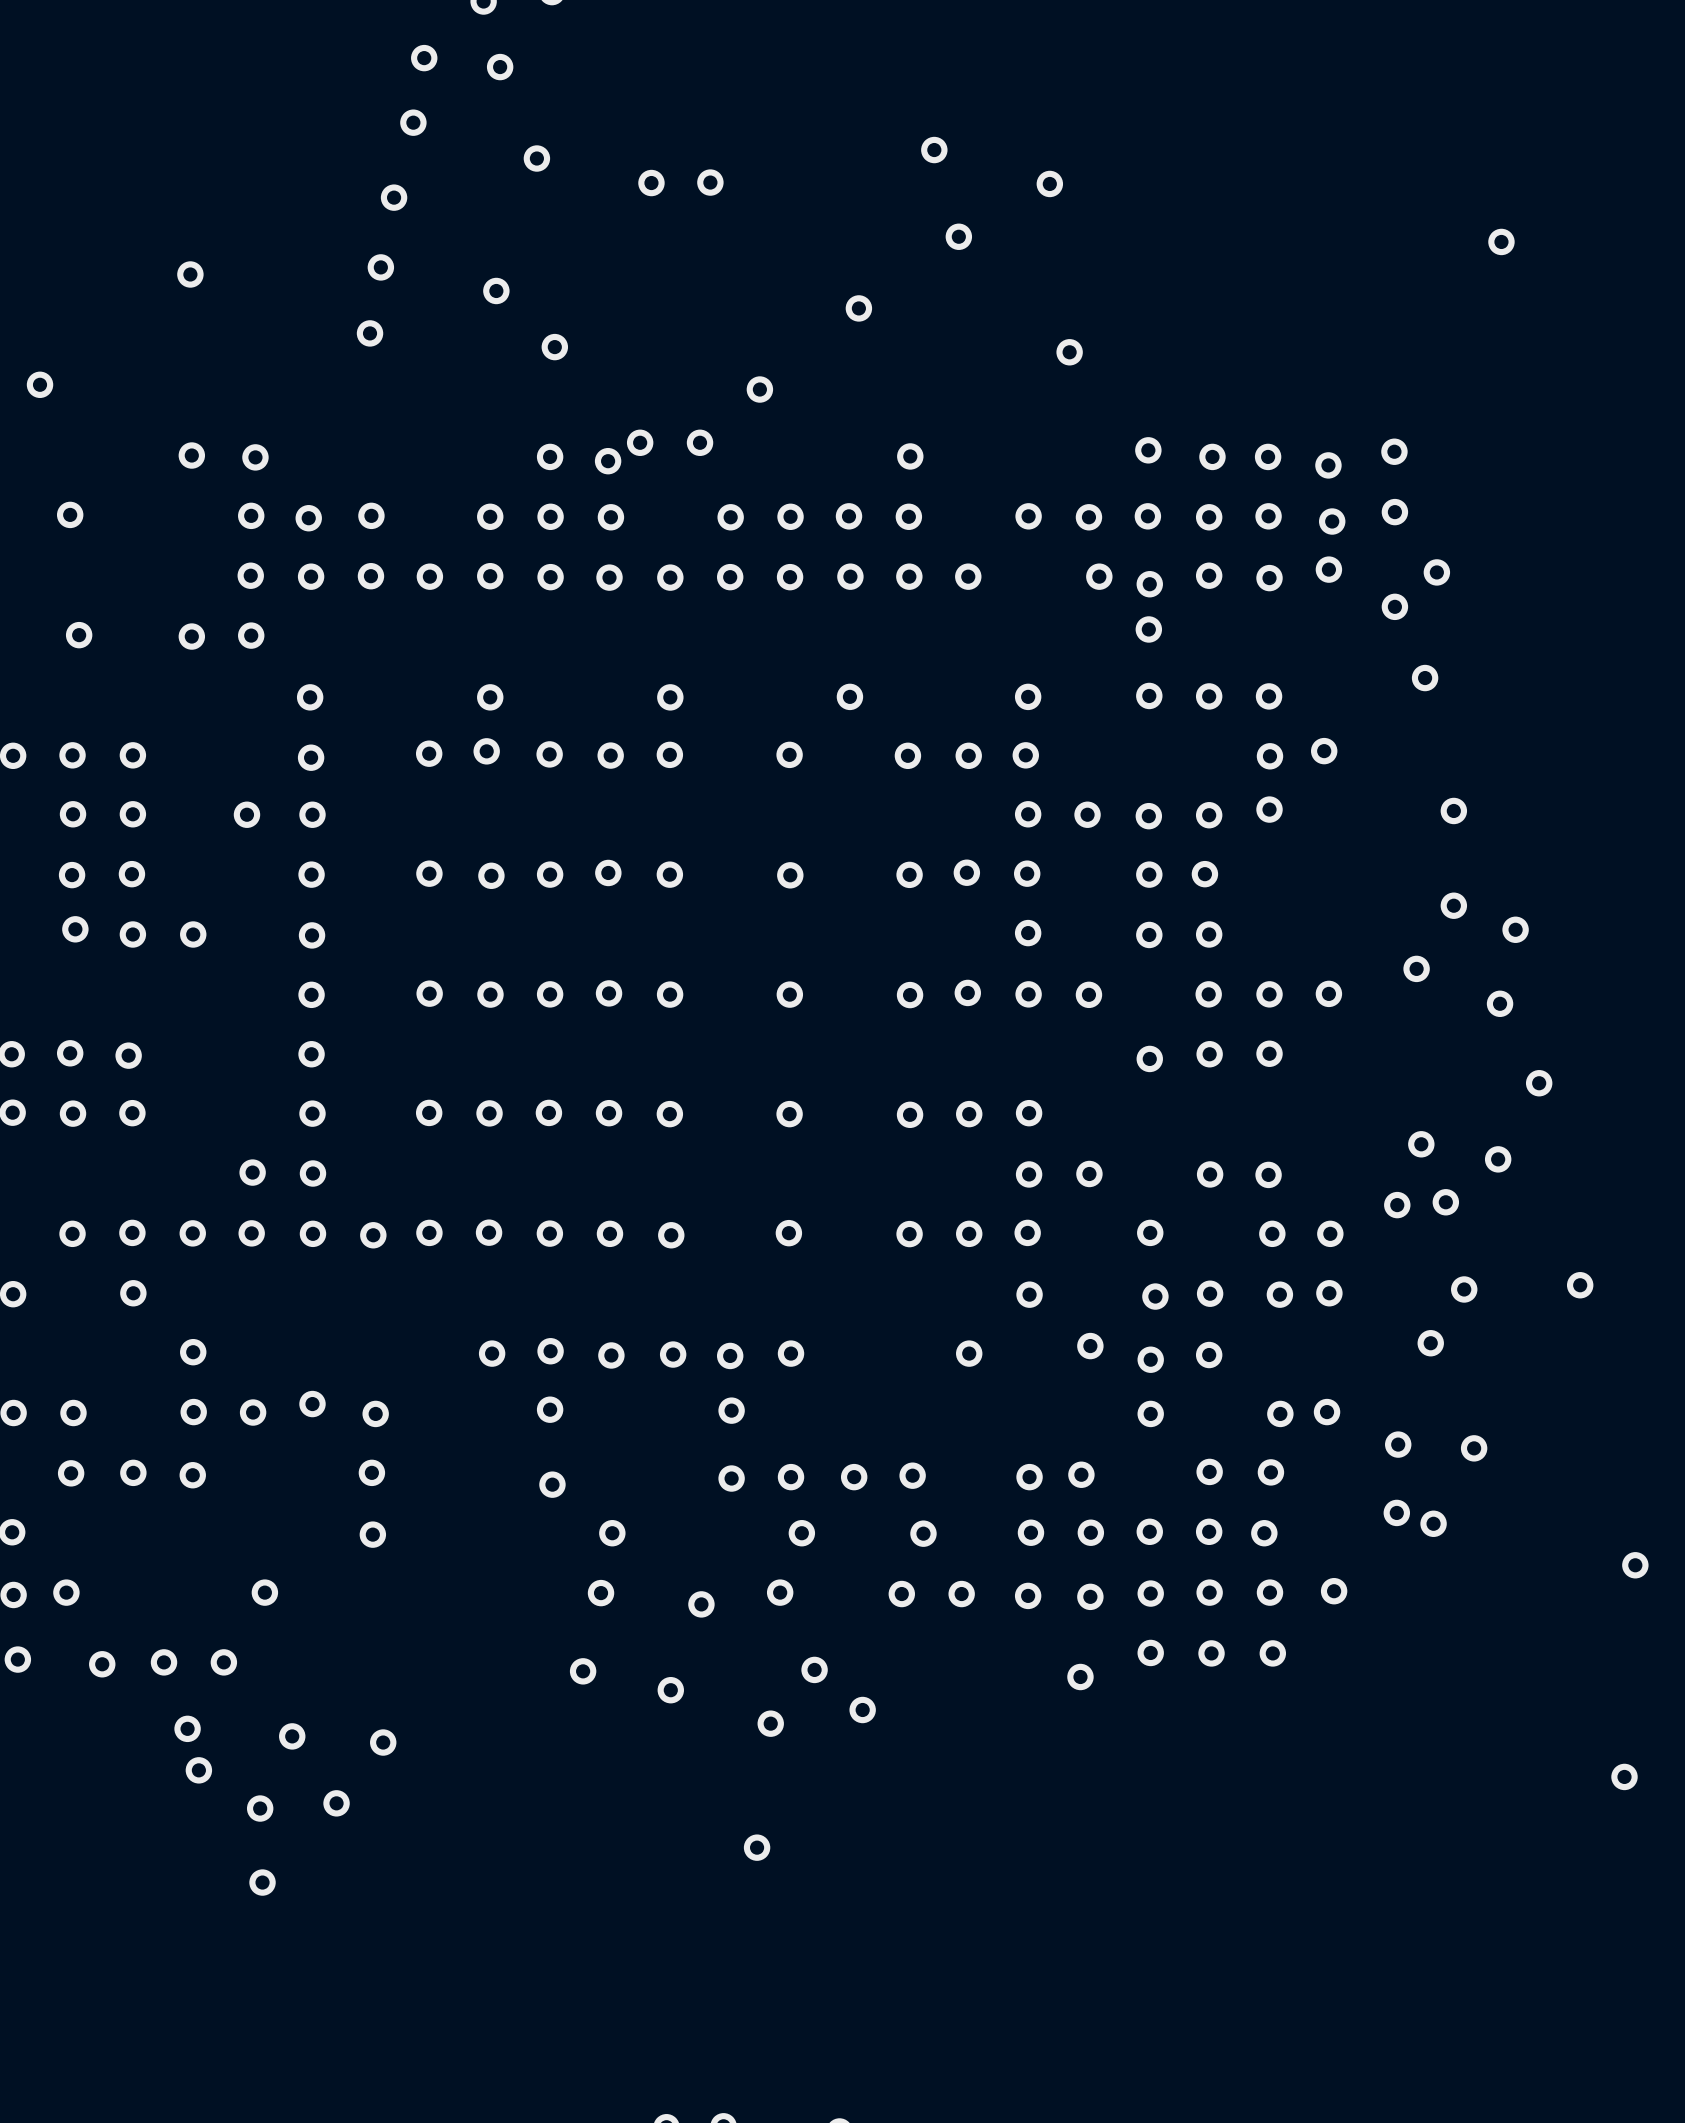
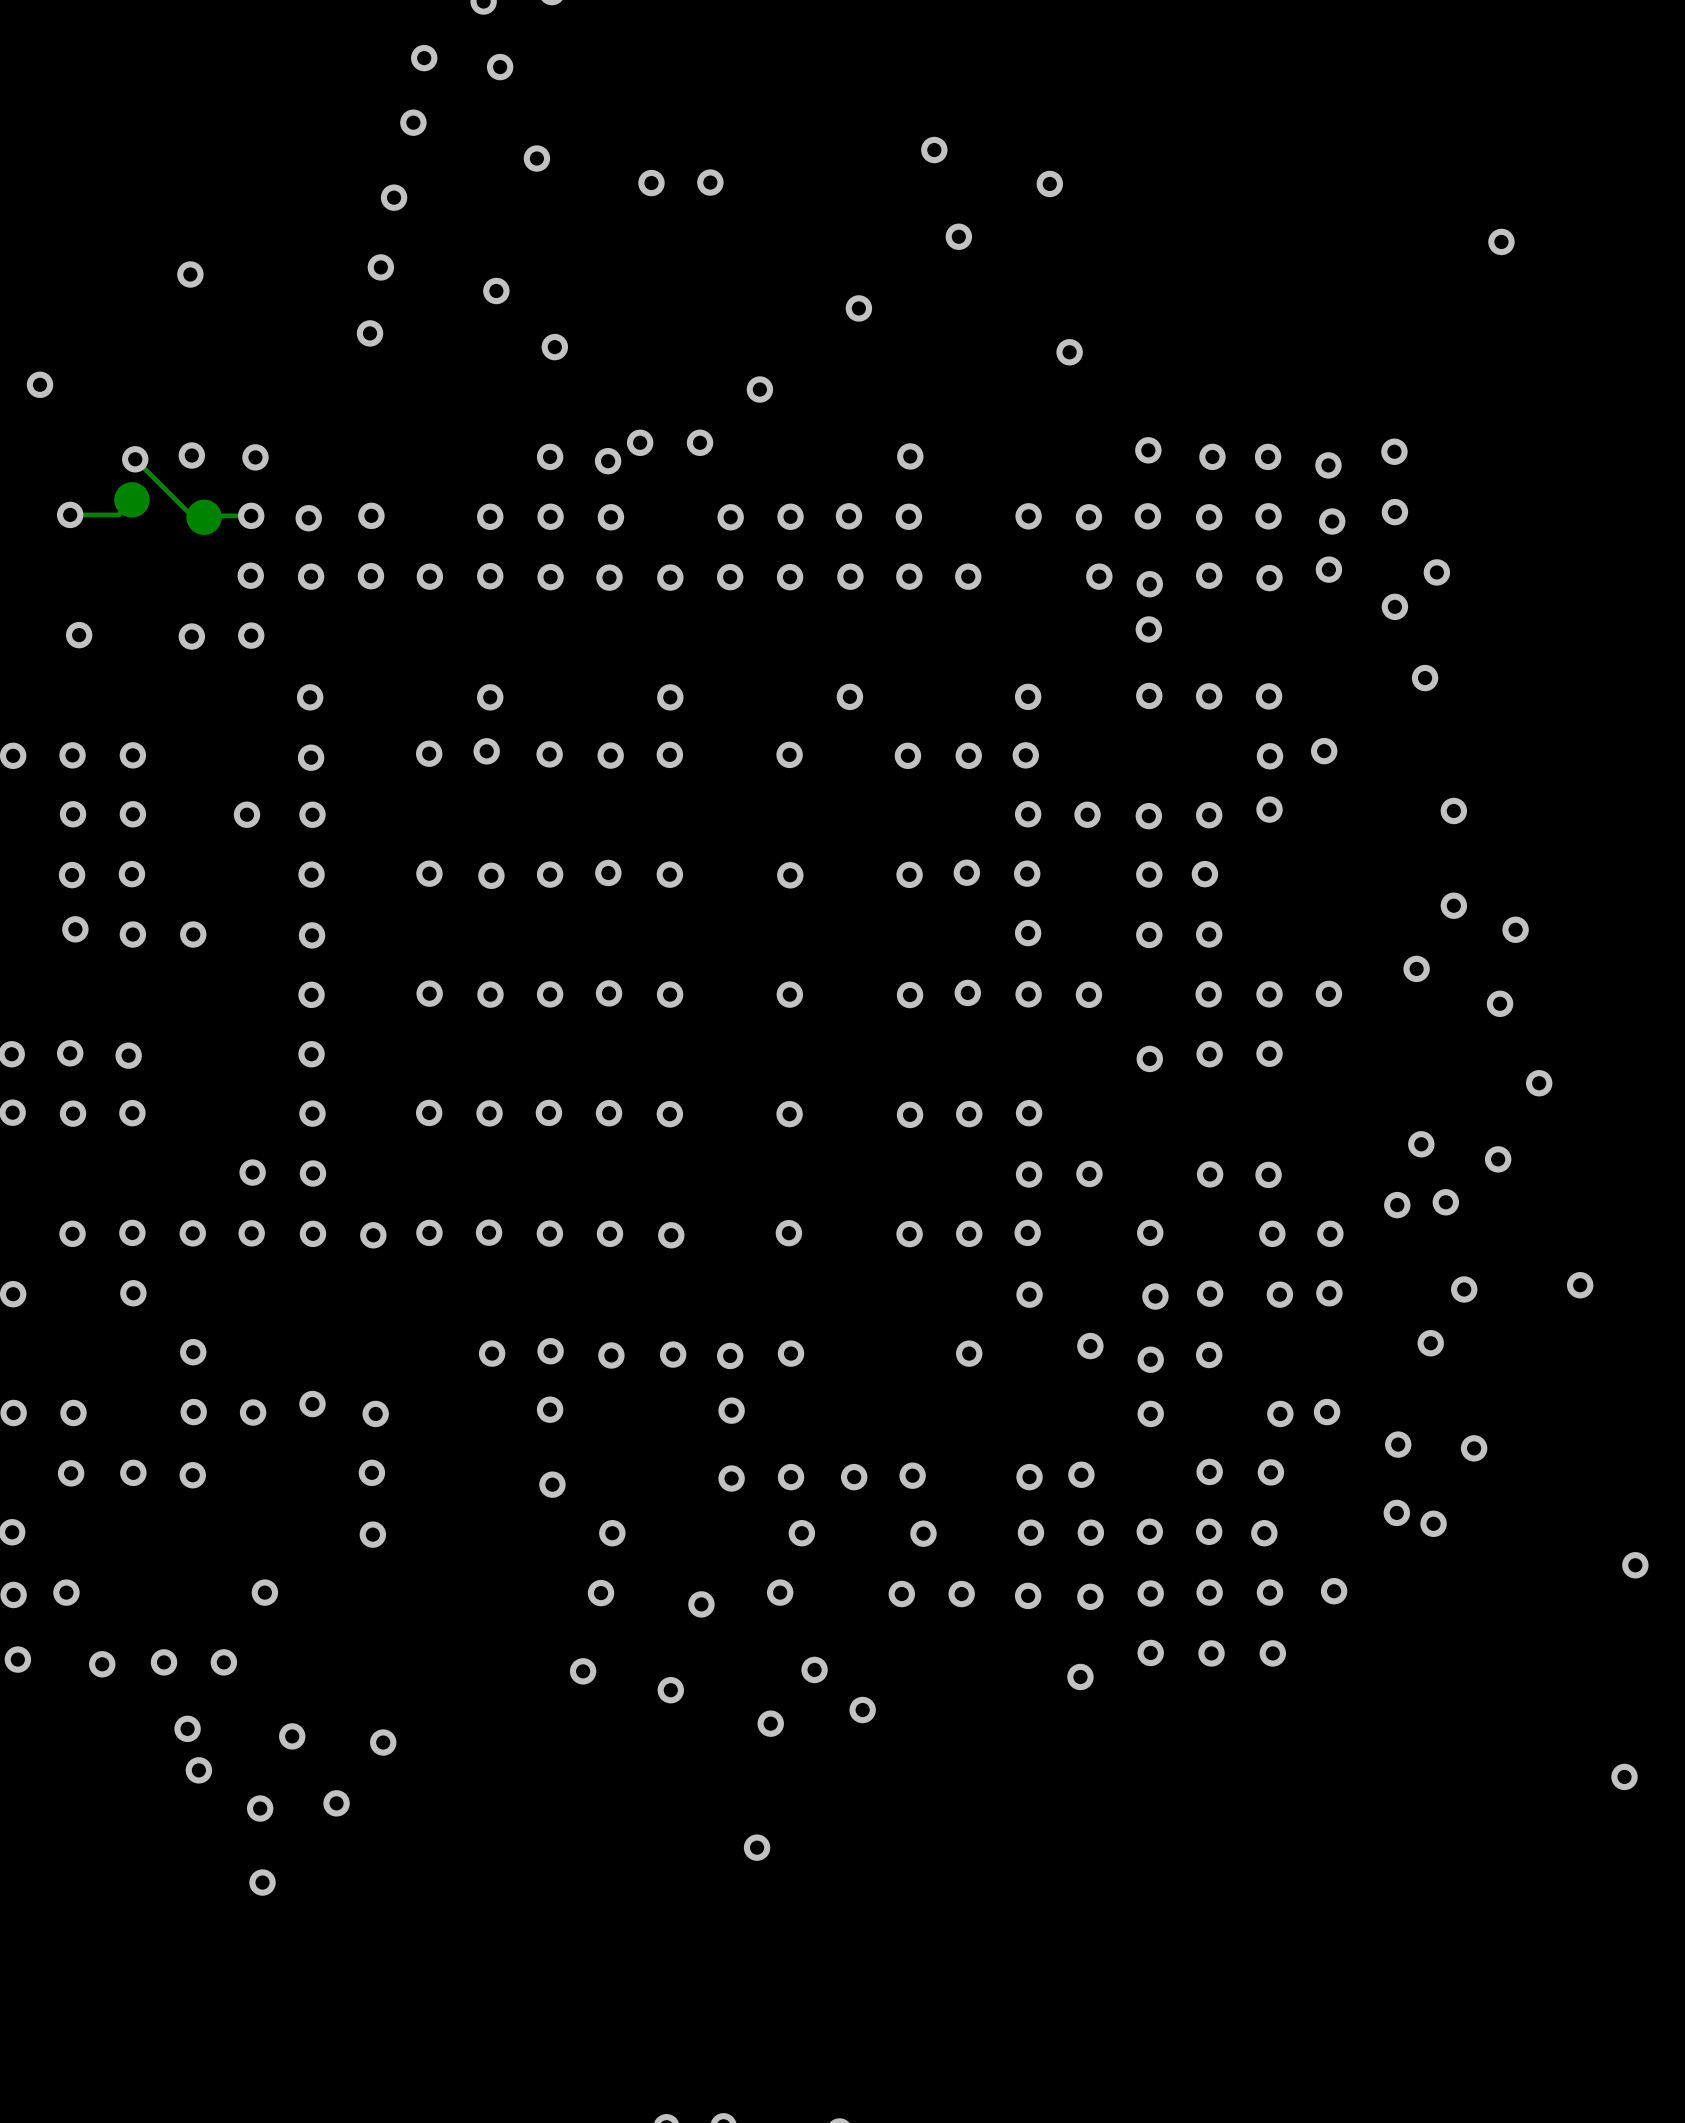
track: none -> (135, 459) (191, 515) (251, 515)
via: none -> (135, 459)
part: none -> (131, 499)
track: none -> (131, 501) (118, 514) (70, 514)
part: none -> (204, 517)

